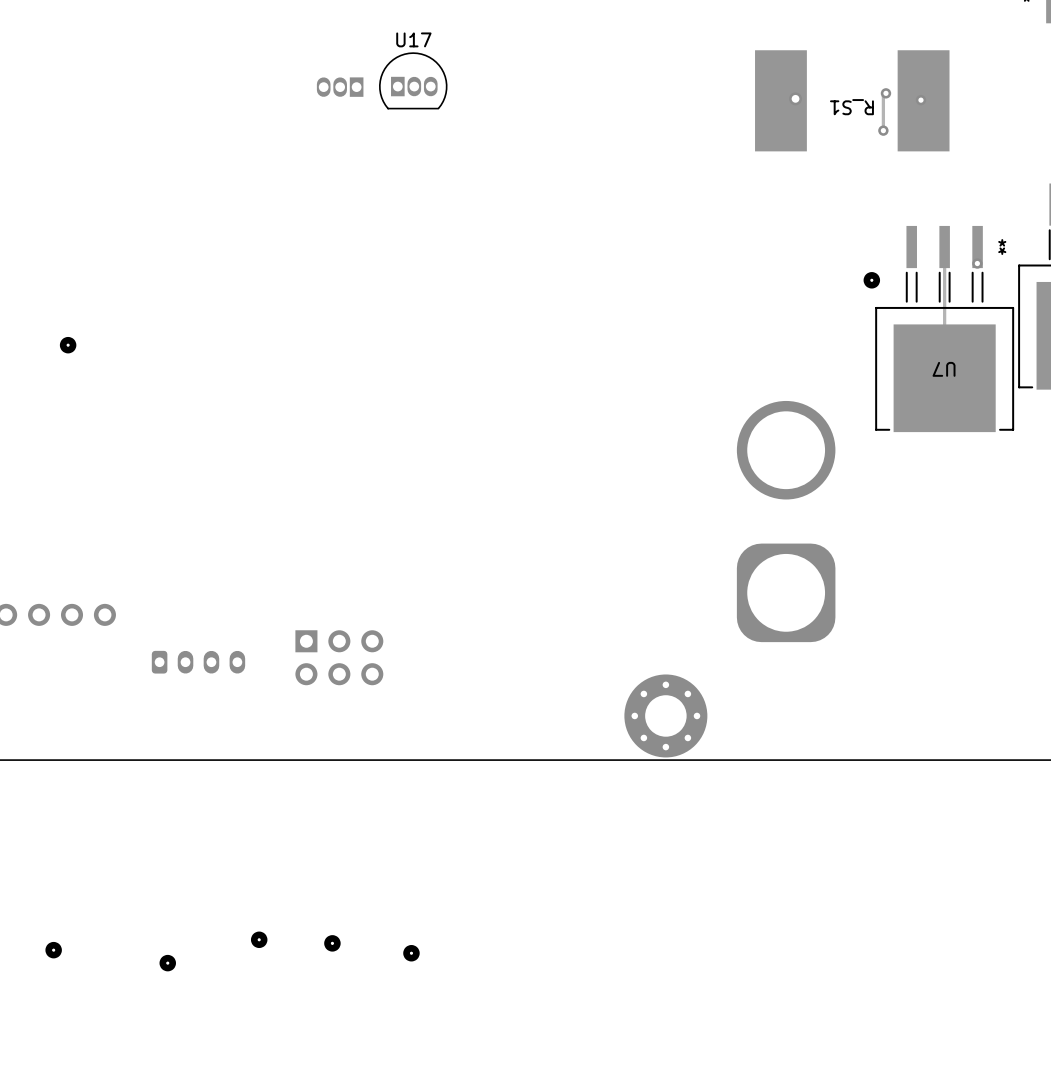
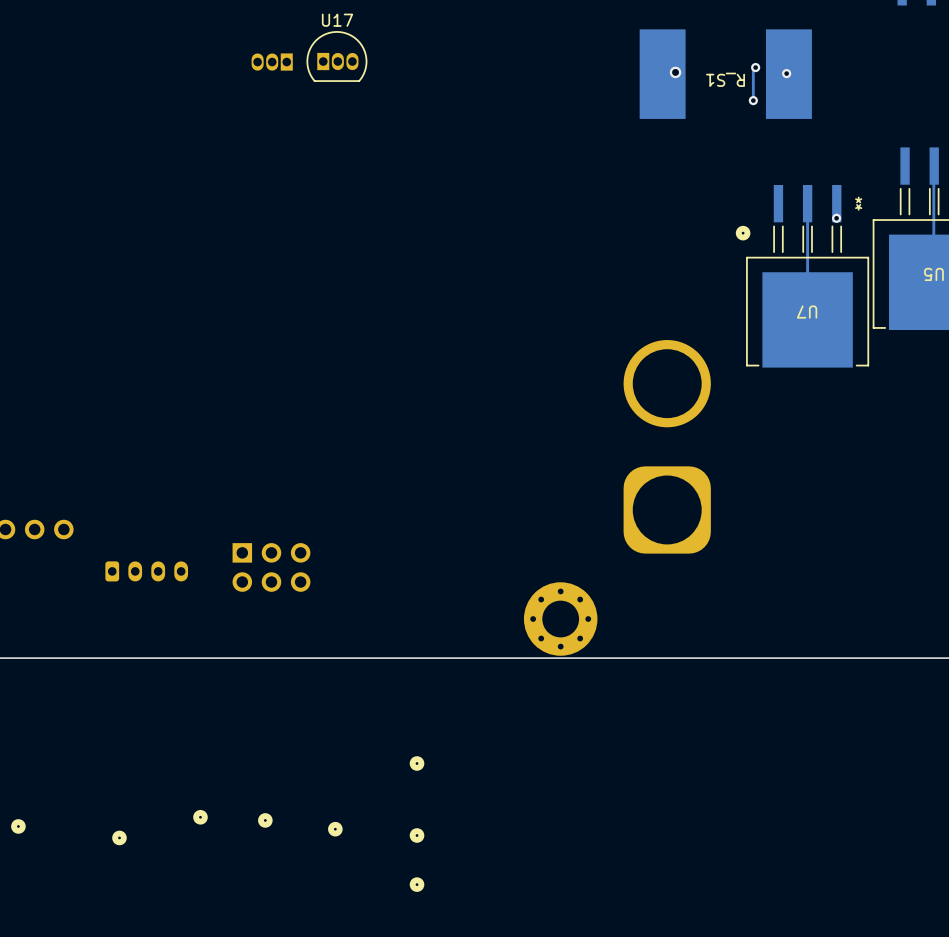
part: (68, 345) -> none
part: none -> (417, 763)
part: none -> (417, 835)
part: none -> (417, 884)

